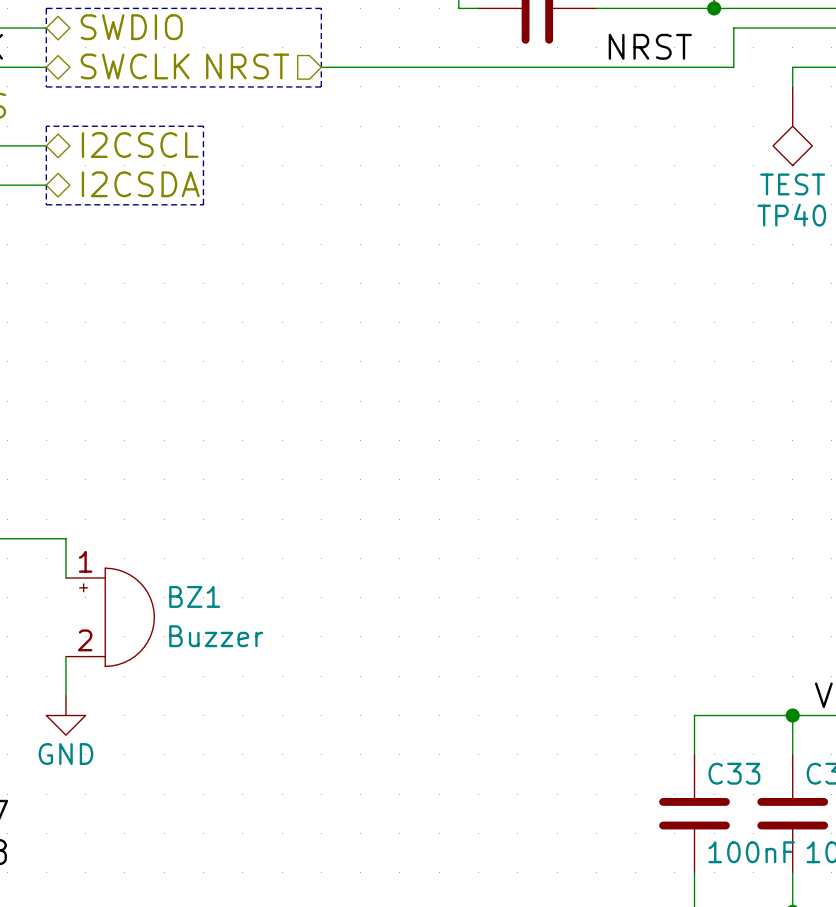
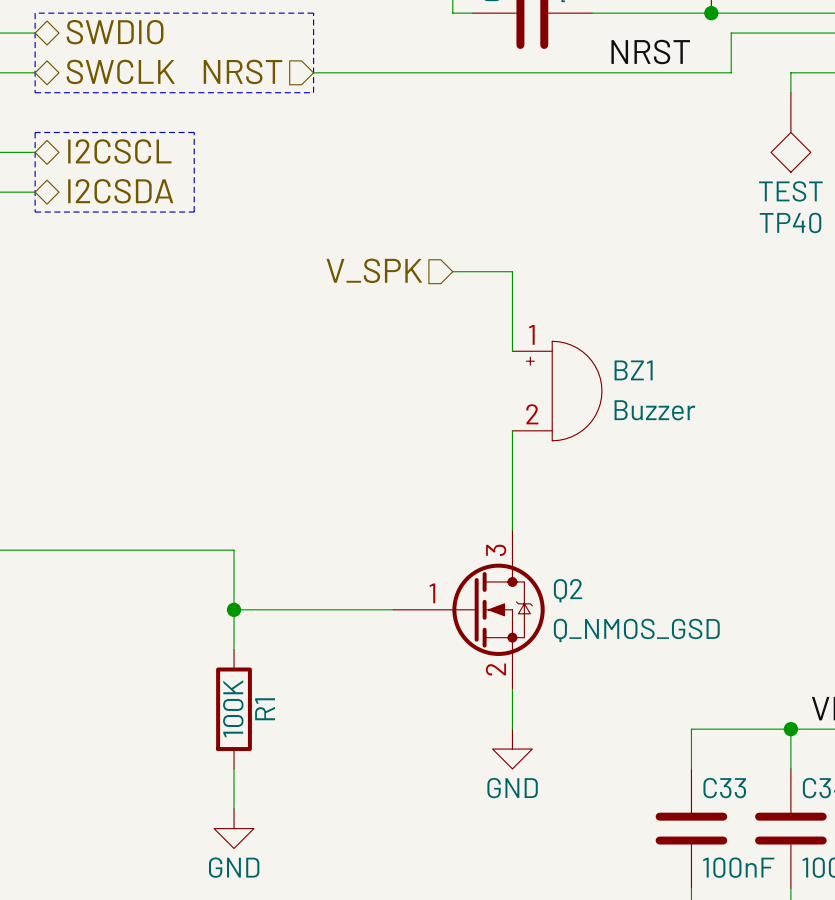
hierarchical label: none -> V_SPK (374, 270)
wire: none -> (452, 271) (512, 271) (512, 351)
wire: none -> (512, 430) (512, 530)
wire: (65, 538) (65, 578) -> (55, 550) (234, 550) (234, 649)
wire: none -> (234, 609) (393, 609)
junction: none -> (234, 609)
Q2: none -> Q_NMOS_GSD (468, 609)
BZ1 position: (110, 617) -> (557, 391)
wire: (65, 656) (65, 695) -> (234, 768) (234, 808)
wire: none -> (512, 689) (512, 729)
R1: none -> 100K (234, 709)
power symbol position: GND (65, 715) -> GND (234, 828)
power symbol: none -> GND (512, 749)

